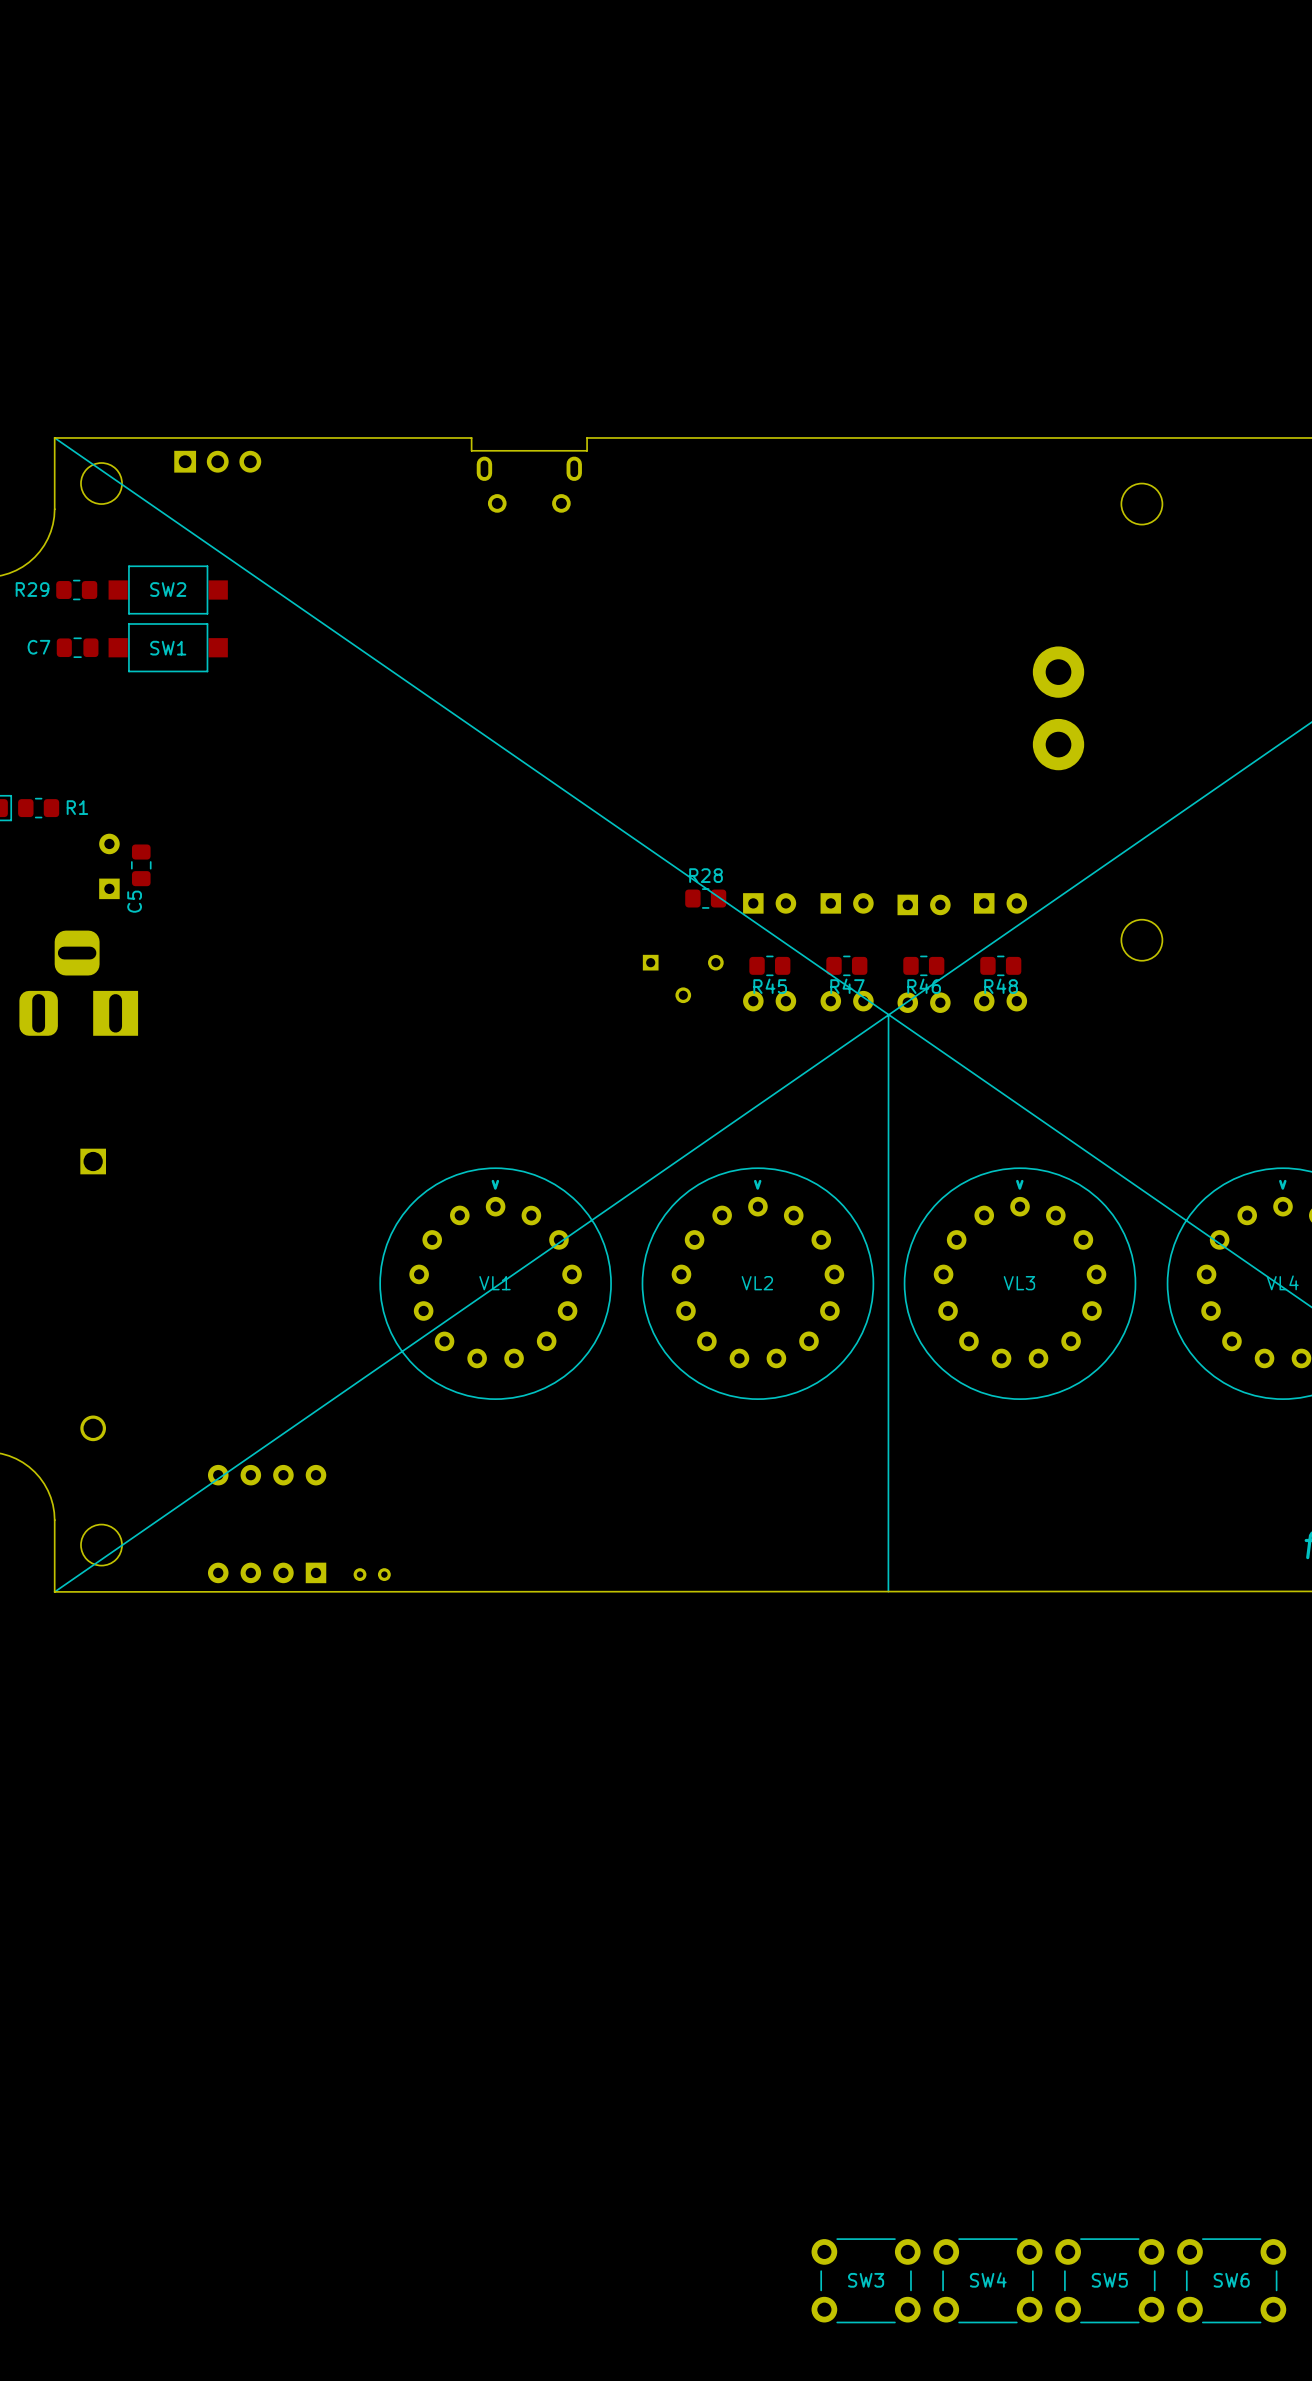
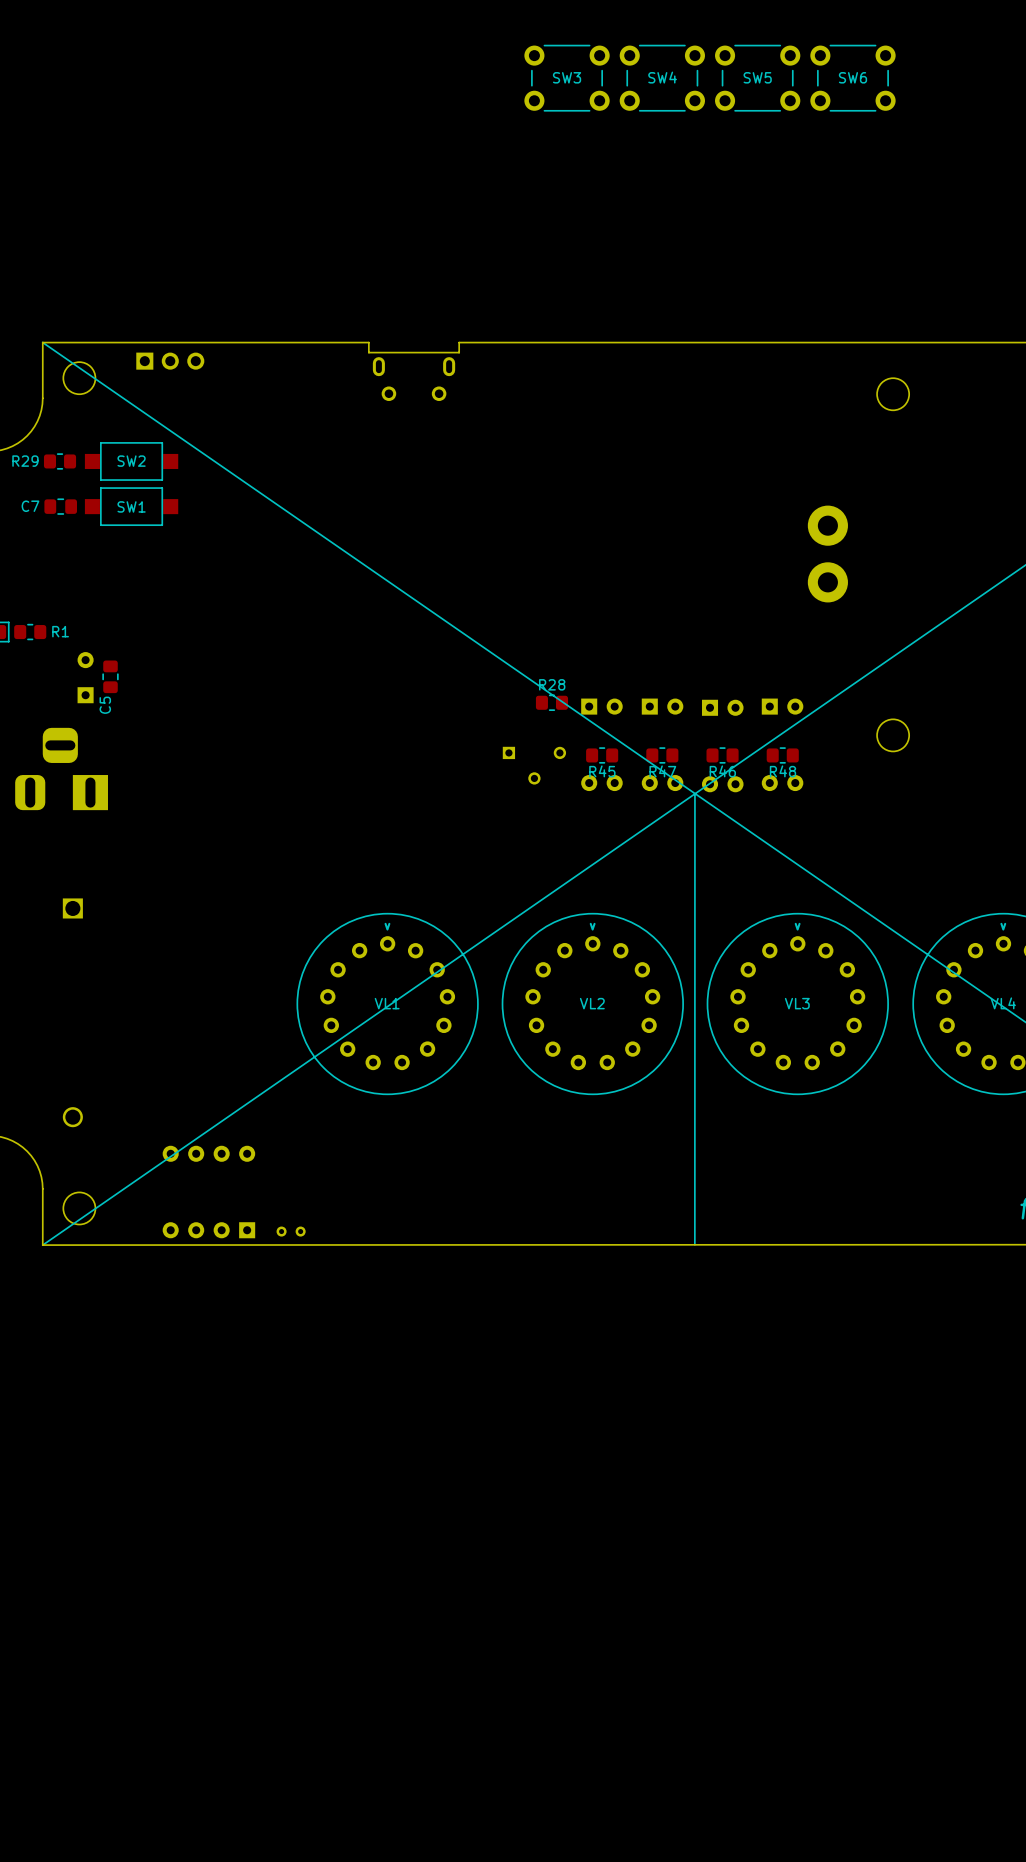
SW3 position: (866, 2280) -> (567, 78)
SW4 position: (987, 2280) -> (662, 78)
SW5 position: (1109, 2280) -> (757, 78)
SW6 position: (1231, 2280) -> (852, 78)

